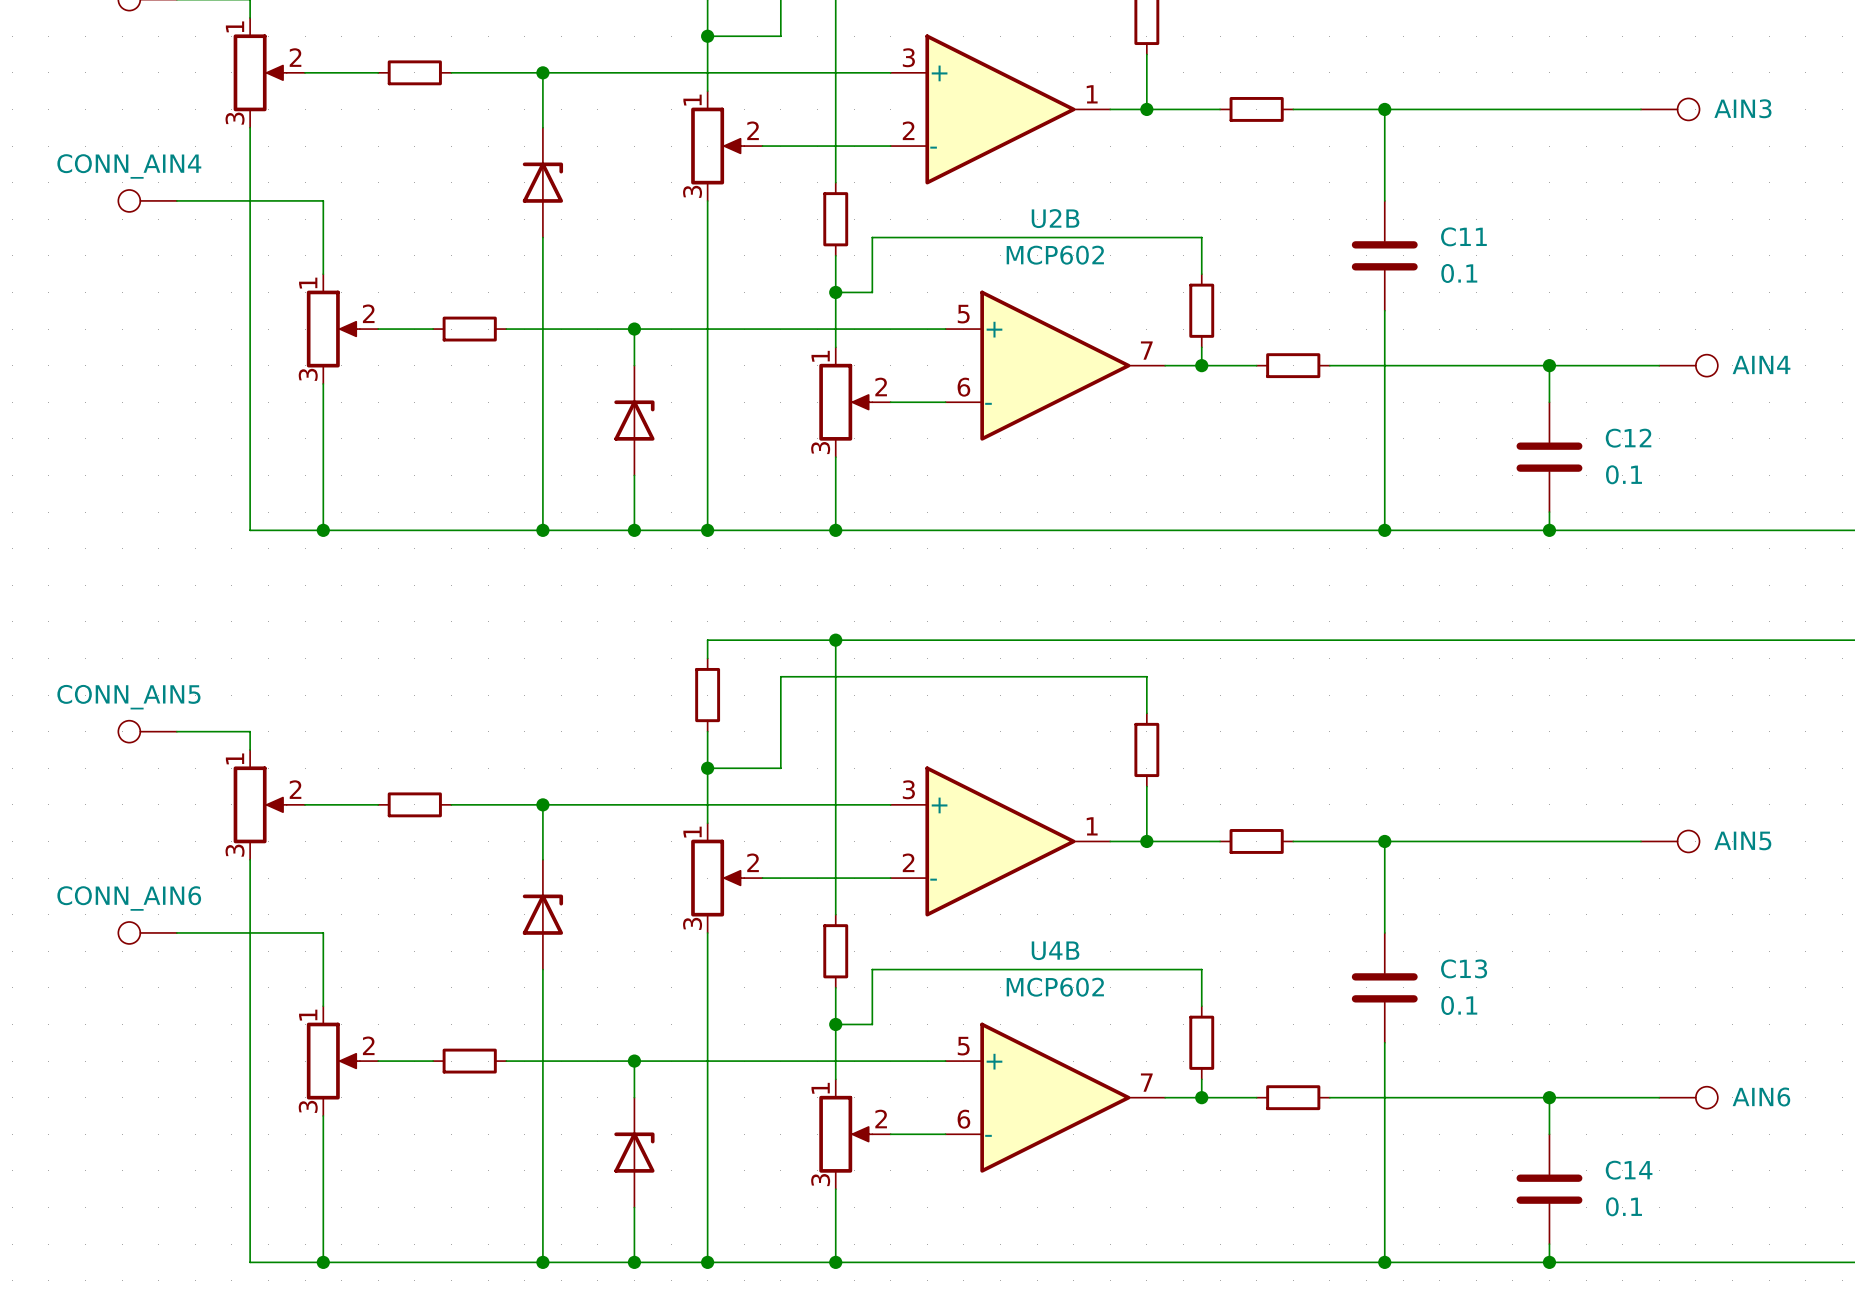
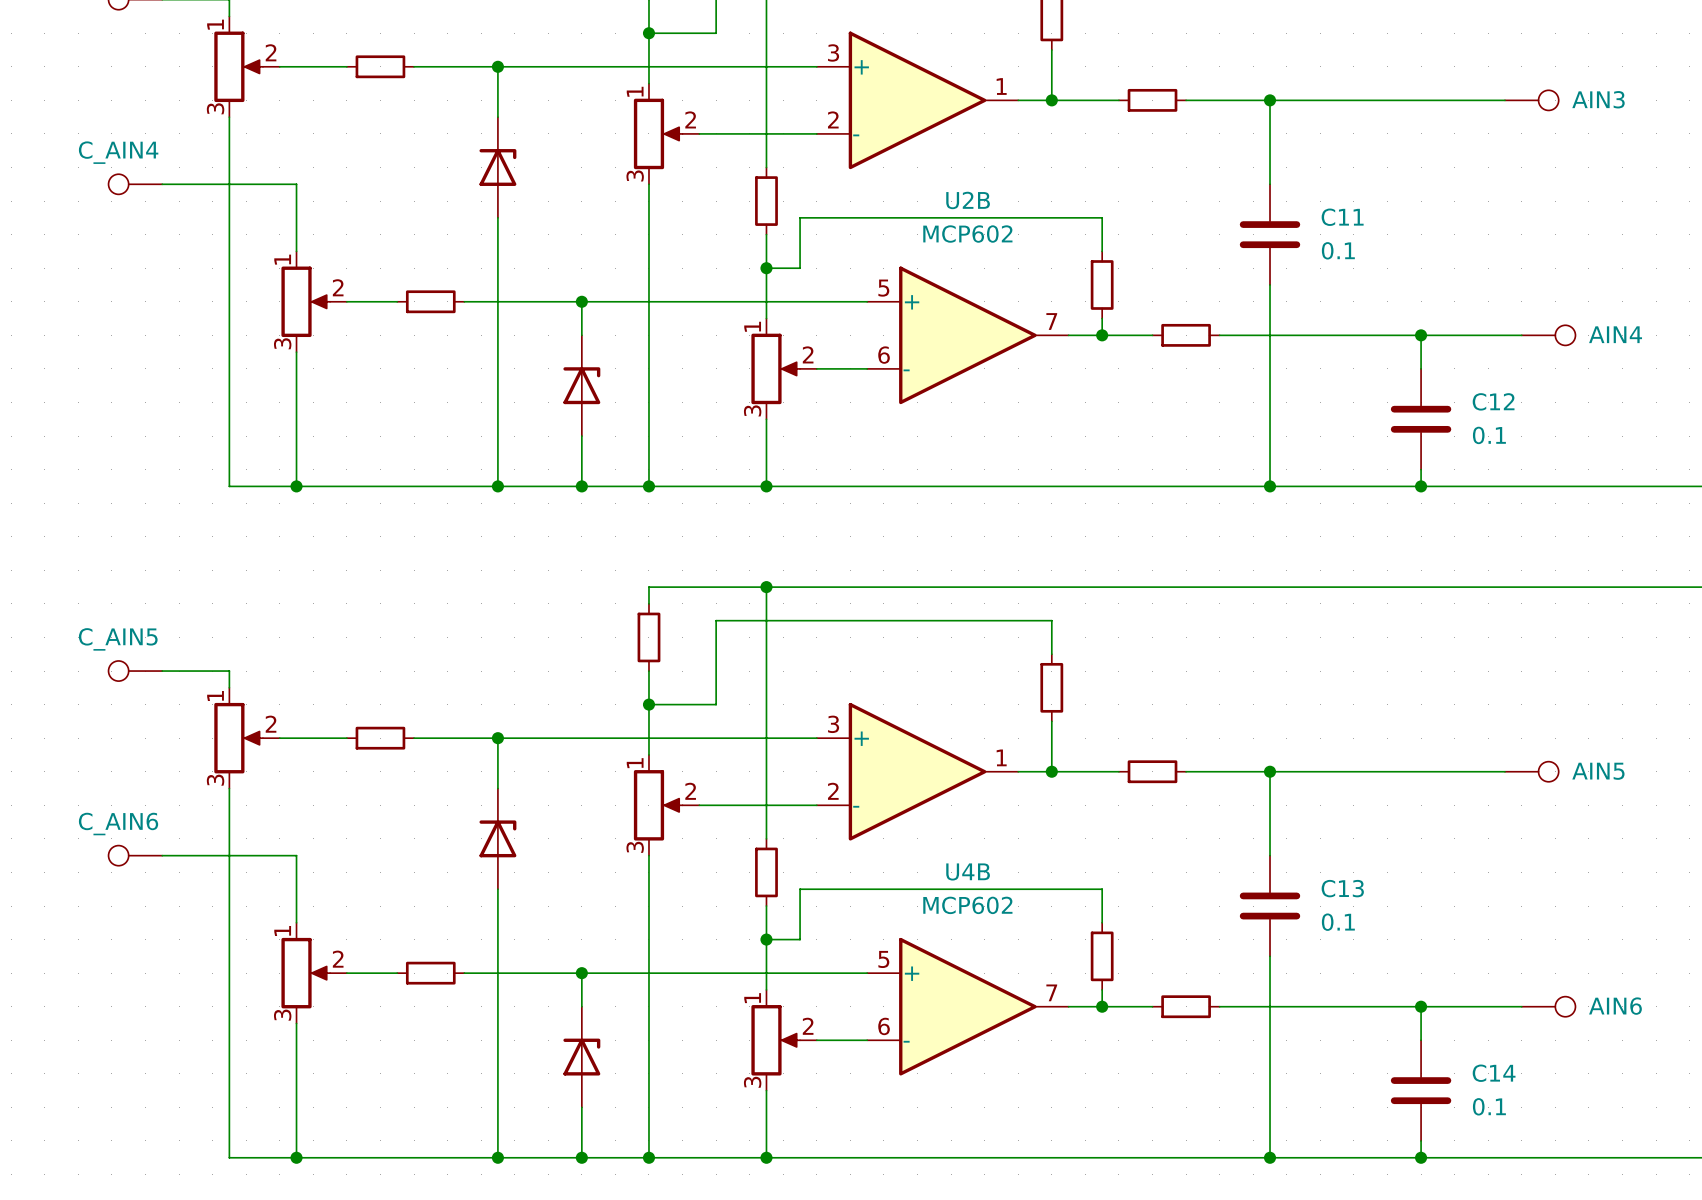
CONN_AIN4 name: CONN_AIN4 (129, 166) -> C_AIN4 (118, 152)
CONN_AIN5 name: CONN_AIN5 (128, 697) -> C_AIN5 (118, 639)
CONN_AIN6 name: CONN_AIN6 (129, 898) -> C_AIN6 (118, 824)

